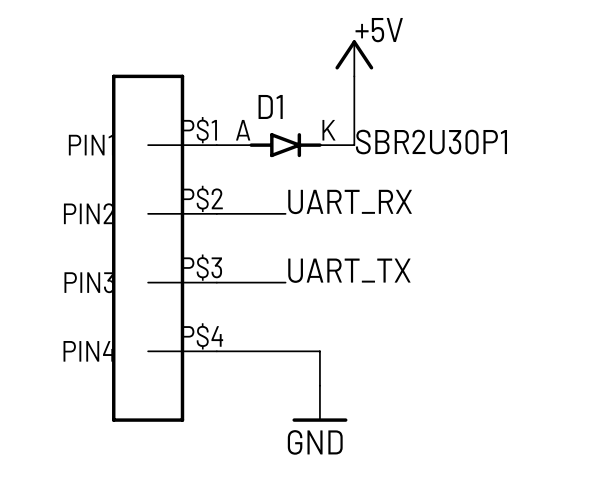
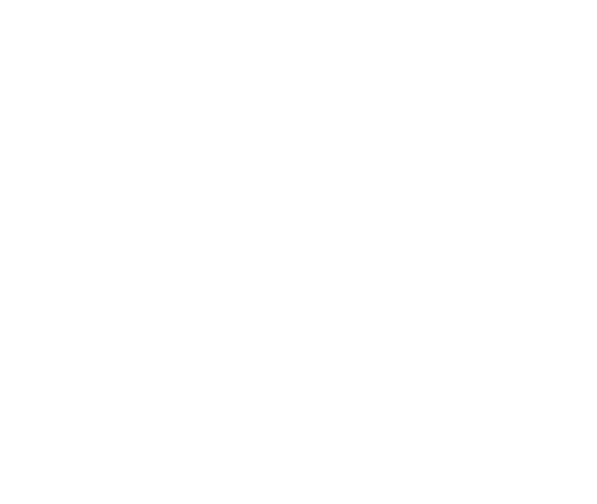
power symbol: +5V (354, 58) -> none
wire: (354, 76) (354, 145) (319, 145) -> none
wire: (216, 145) (251, 145) -> none
D1: SBR2U30P1 (285, 145) -> none
label: UART_RX (350, 201) -> none
wire: (216, 213) (285, 213) -> none
part: (164, 248) -> none
label: UART_TX (349, 270) -> none
wire: (216, 282) (285, 282) -> none
wire: (216, 351) (319, 351) (319, 385) -> none
power symbol: GND (319, 403) -> none

